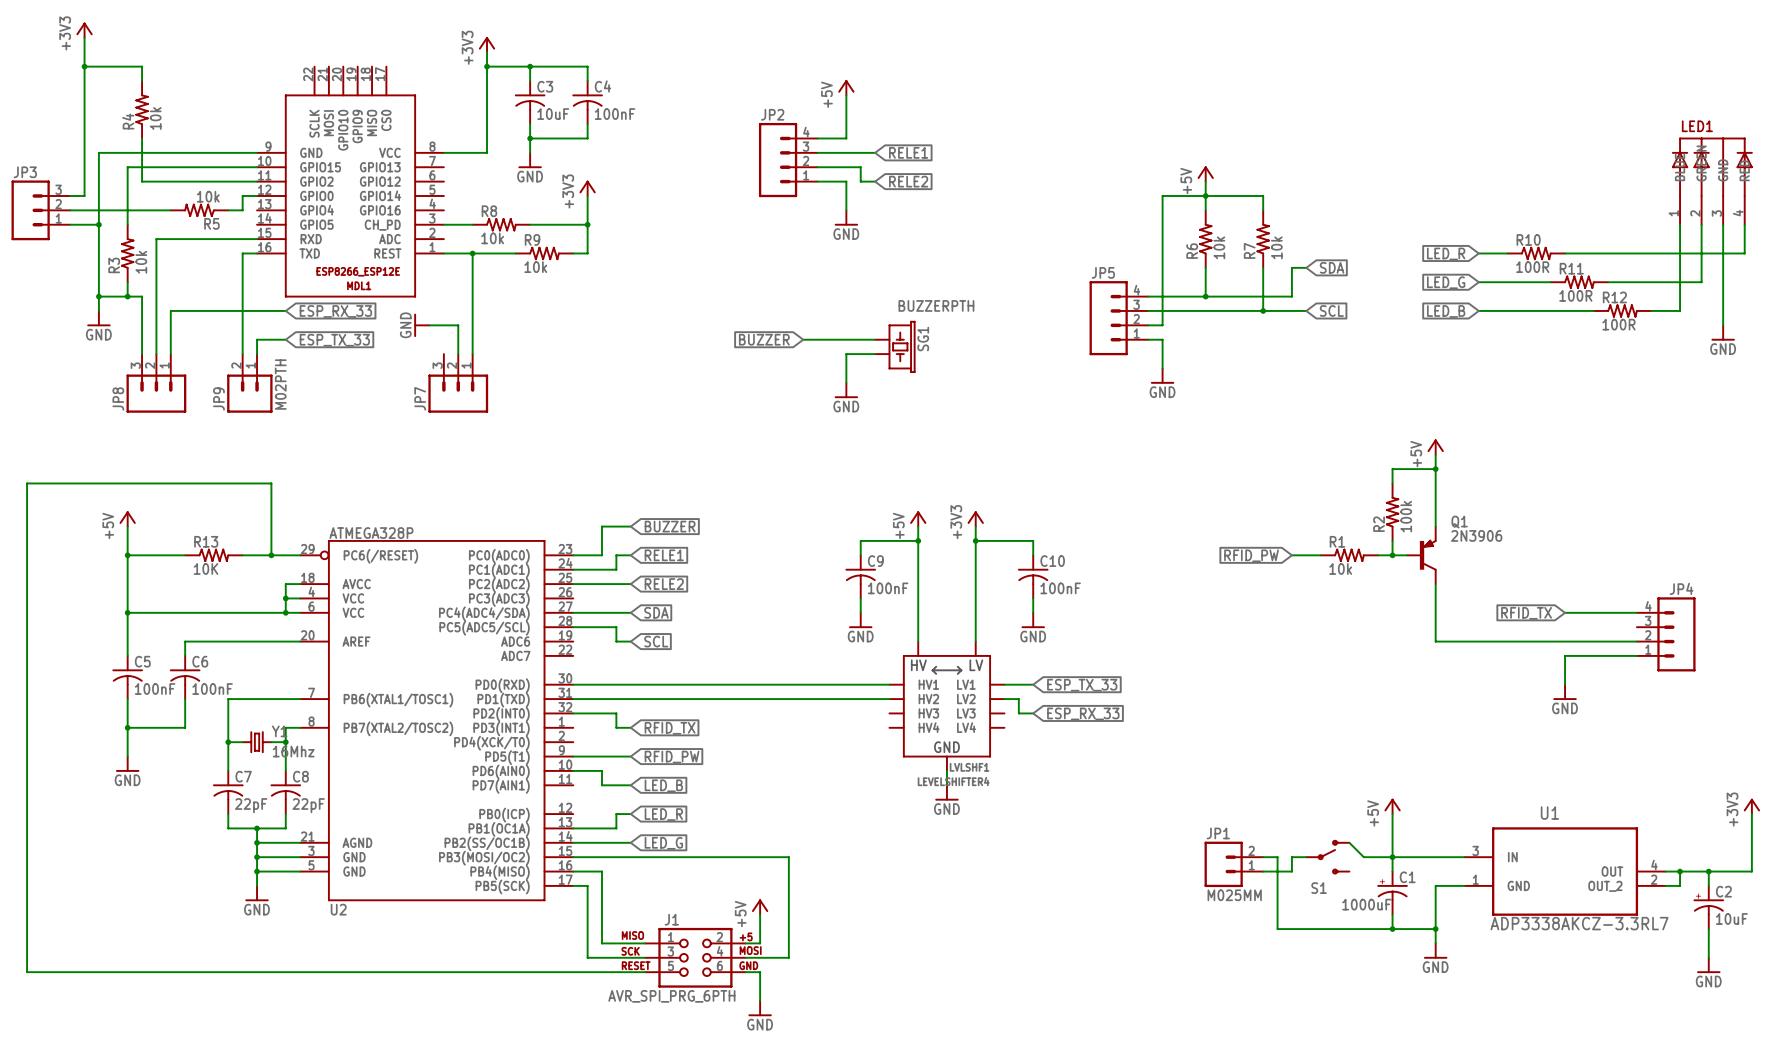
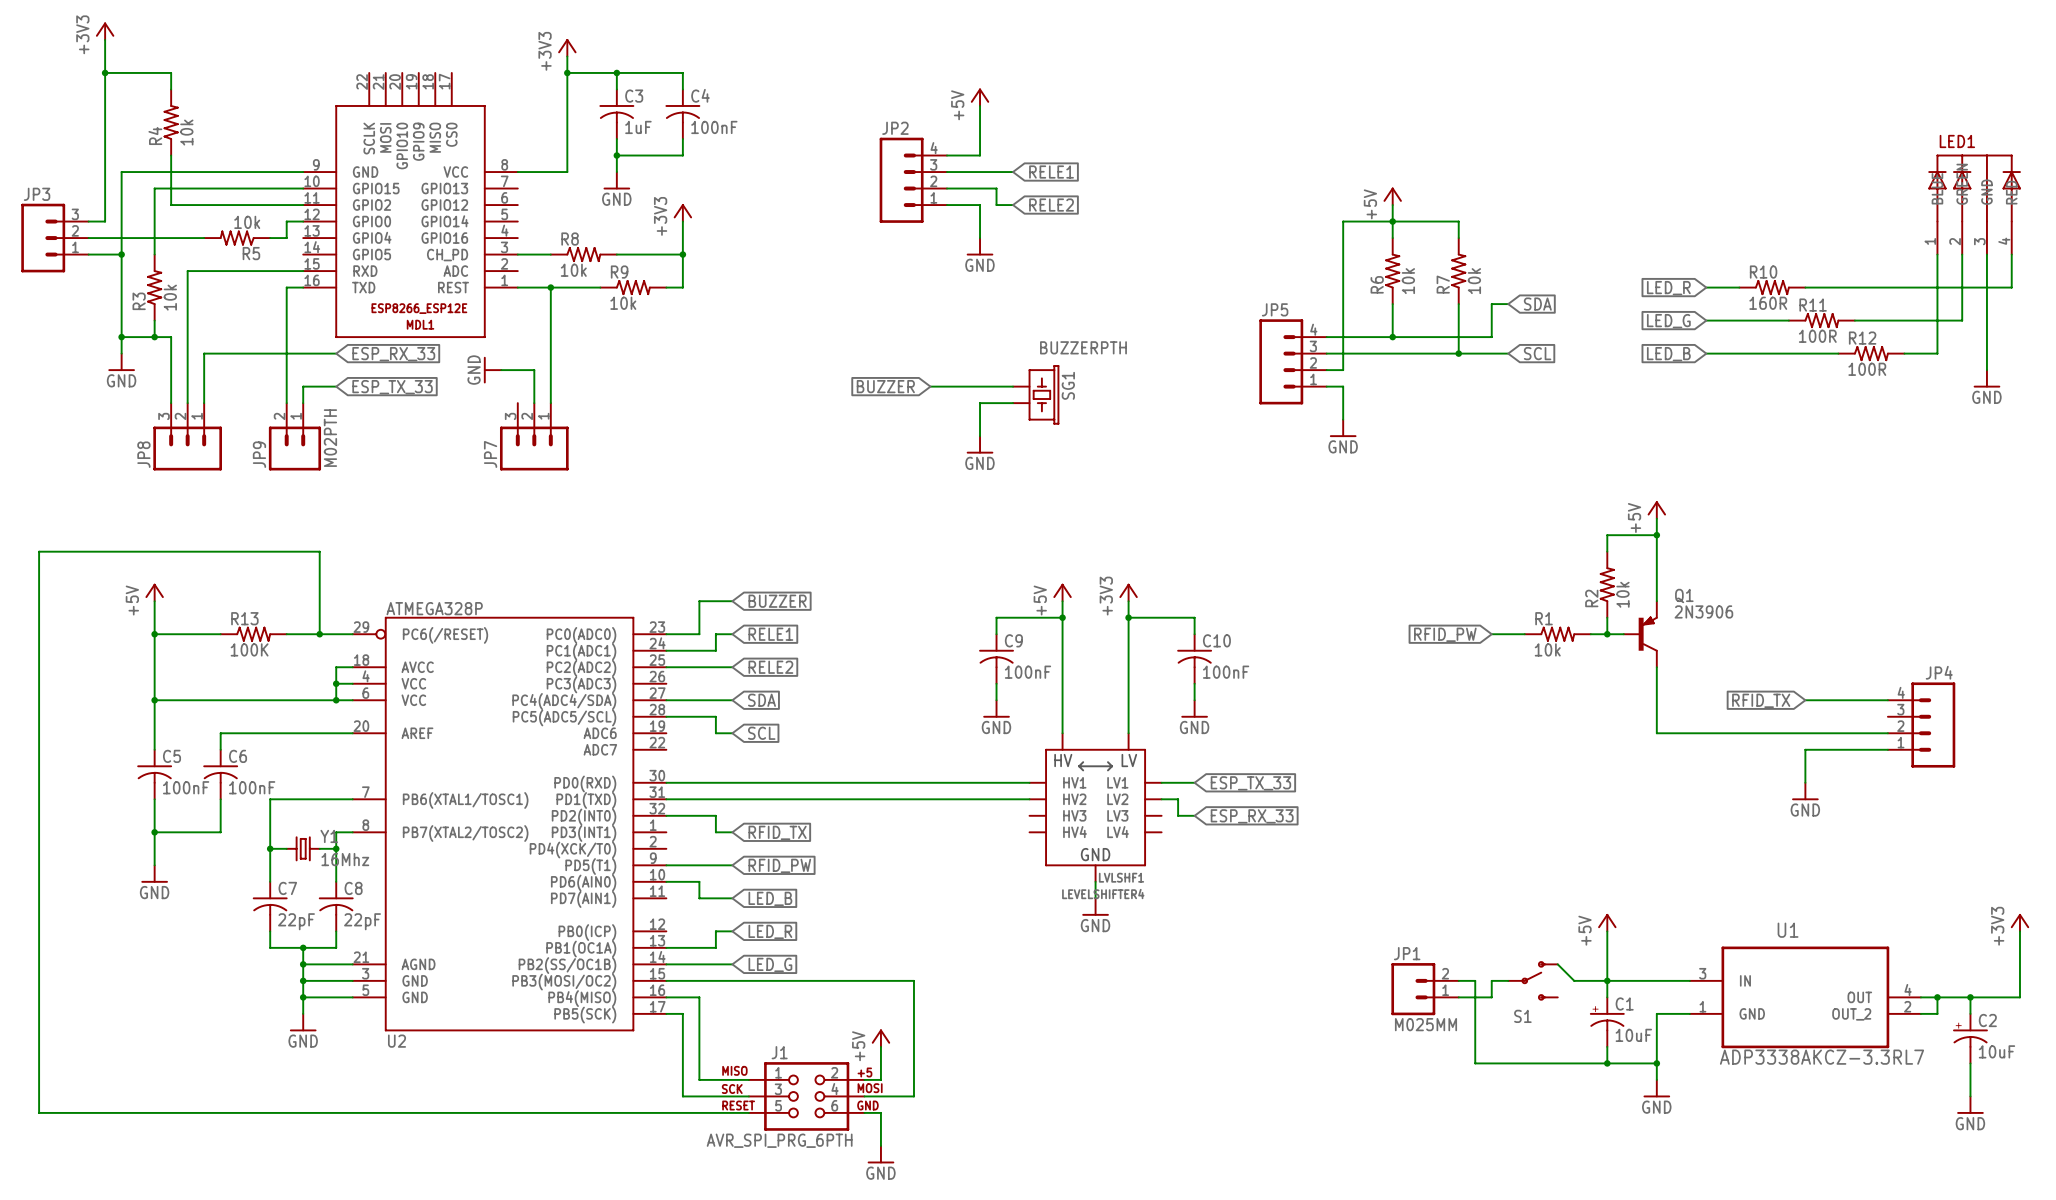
C3 value: 10uF (553, 114) -> 1uF (638, 127)
R10 value: 100R (1532, 267) -> 160R (1768, 303)
R2 value: 100k (1406, 516) -> 10k (1622, 594)
R13 value: 10K (206, 568) -> 100K (249, 649)
C1 value: 1000uF (1366, 904) -> 10uF (1633, 1035)

